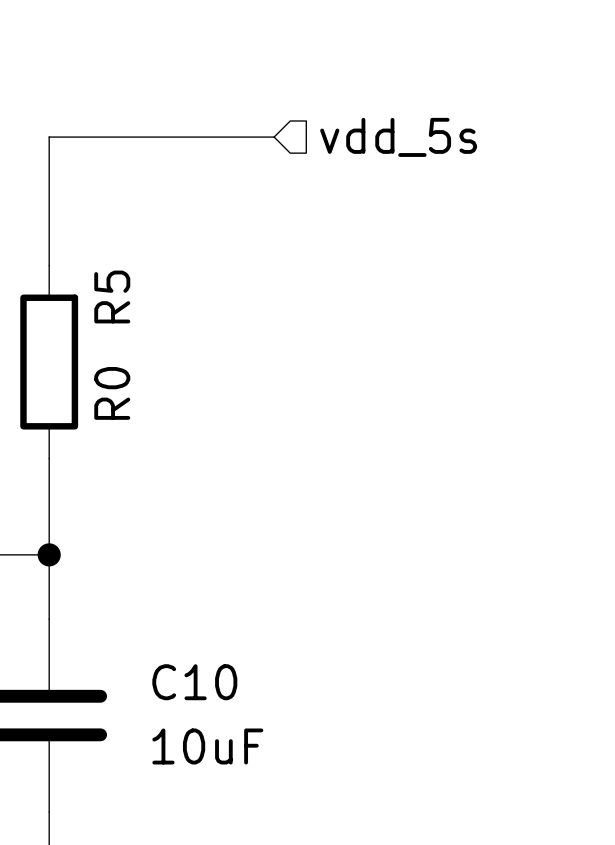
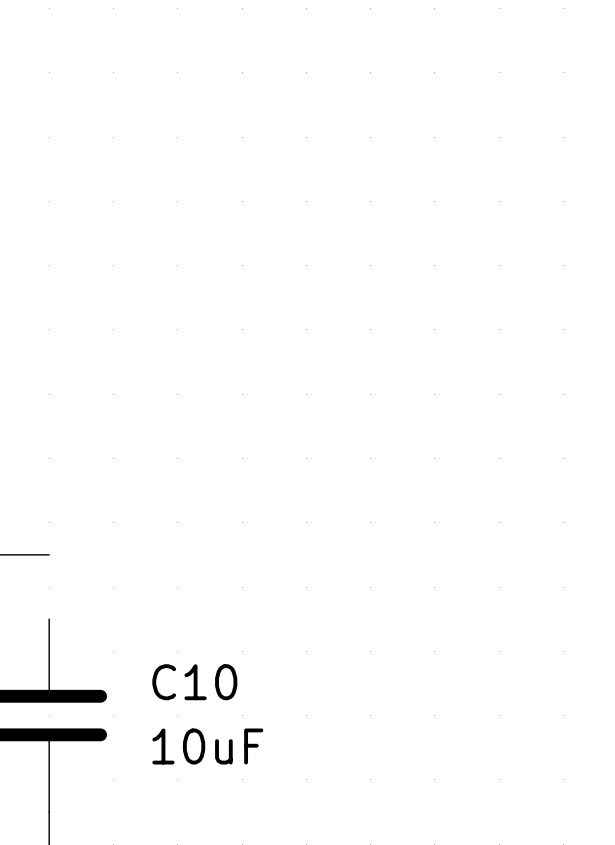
wire: (274, 137) (49, 137) (49, 265) -> none
hierarchical label: vdd_5s (398, 137) -> none
R5: R0 (49, 362) -> none
wire: (49, 458) (49, 619) -> none
junction: (49, 554) -> none

